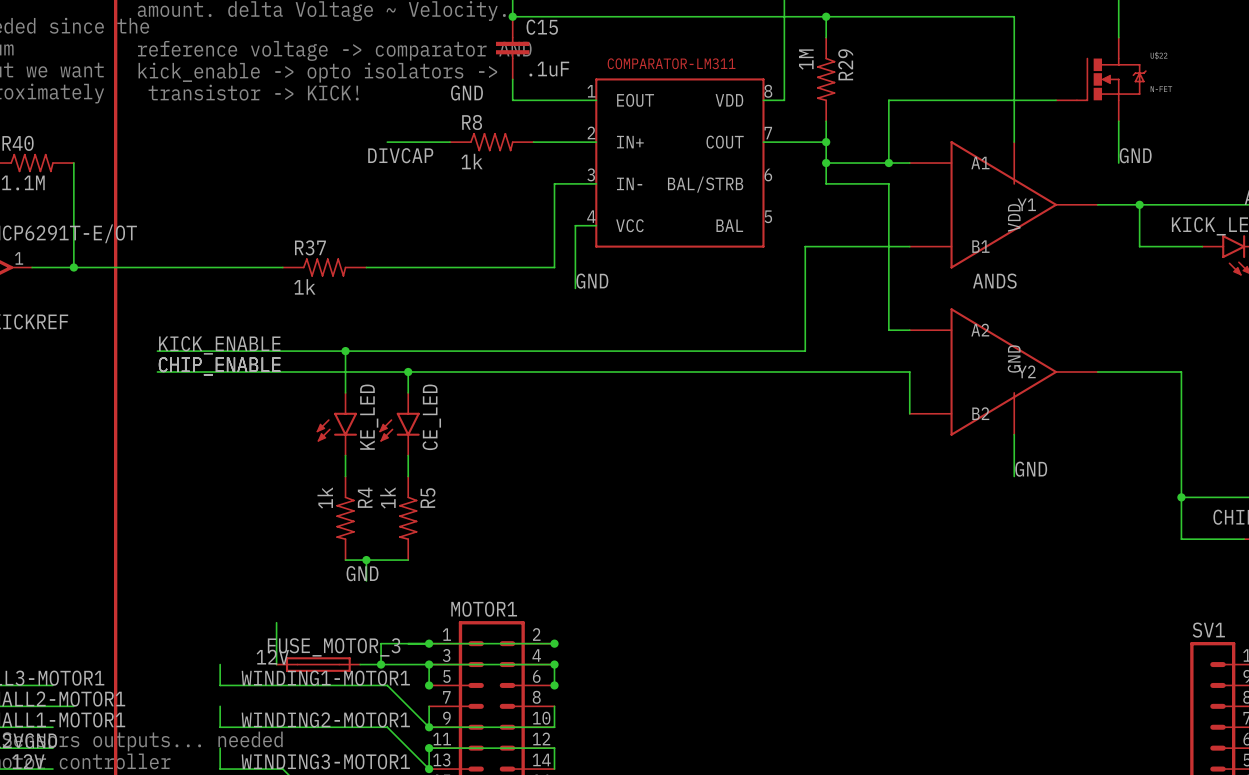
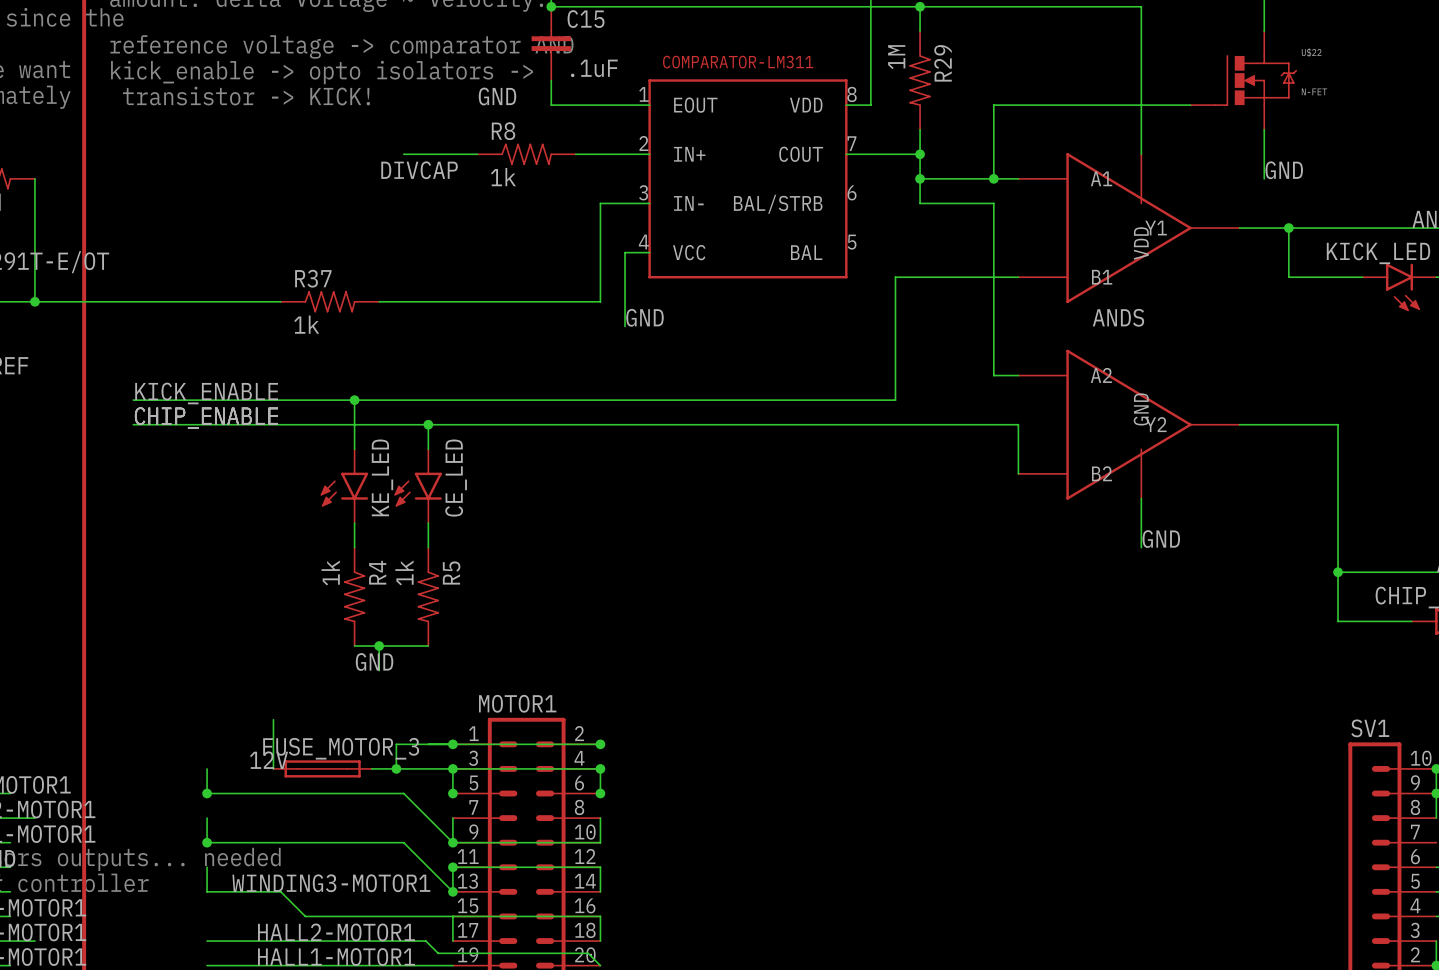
label: WINDING1-MOTOR1 (325, 678) -> none
junction: none -> (207, 793)
label: WINDING2-MOTOR1 (325, 719) -> none
junction: none -> (207, 842)

